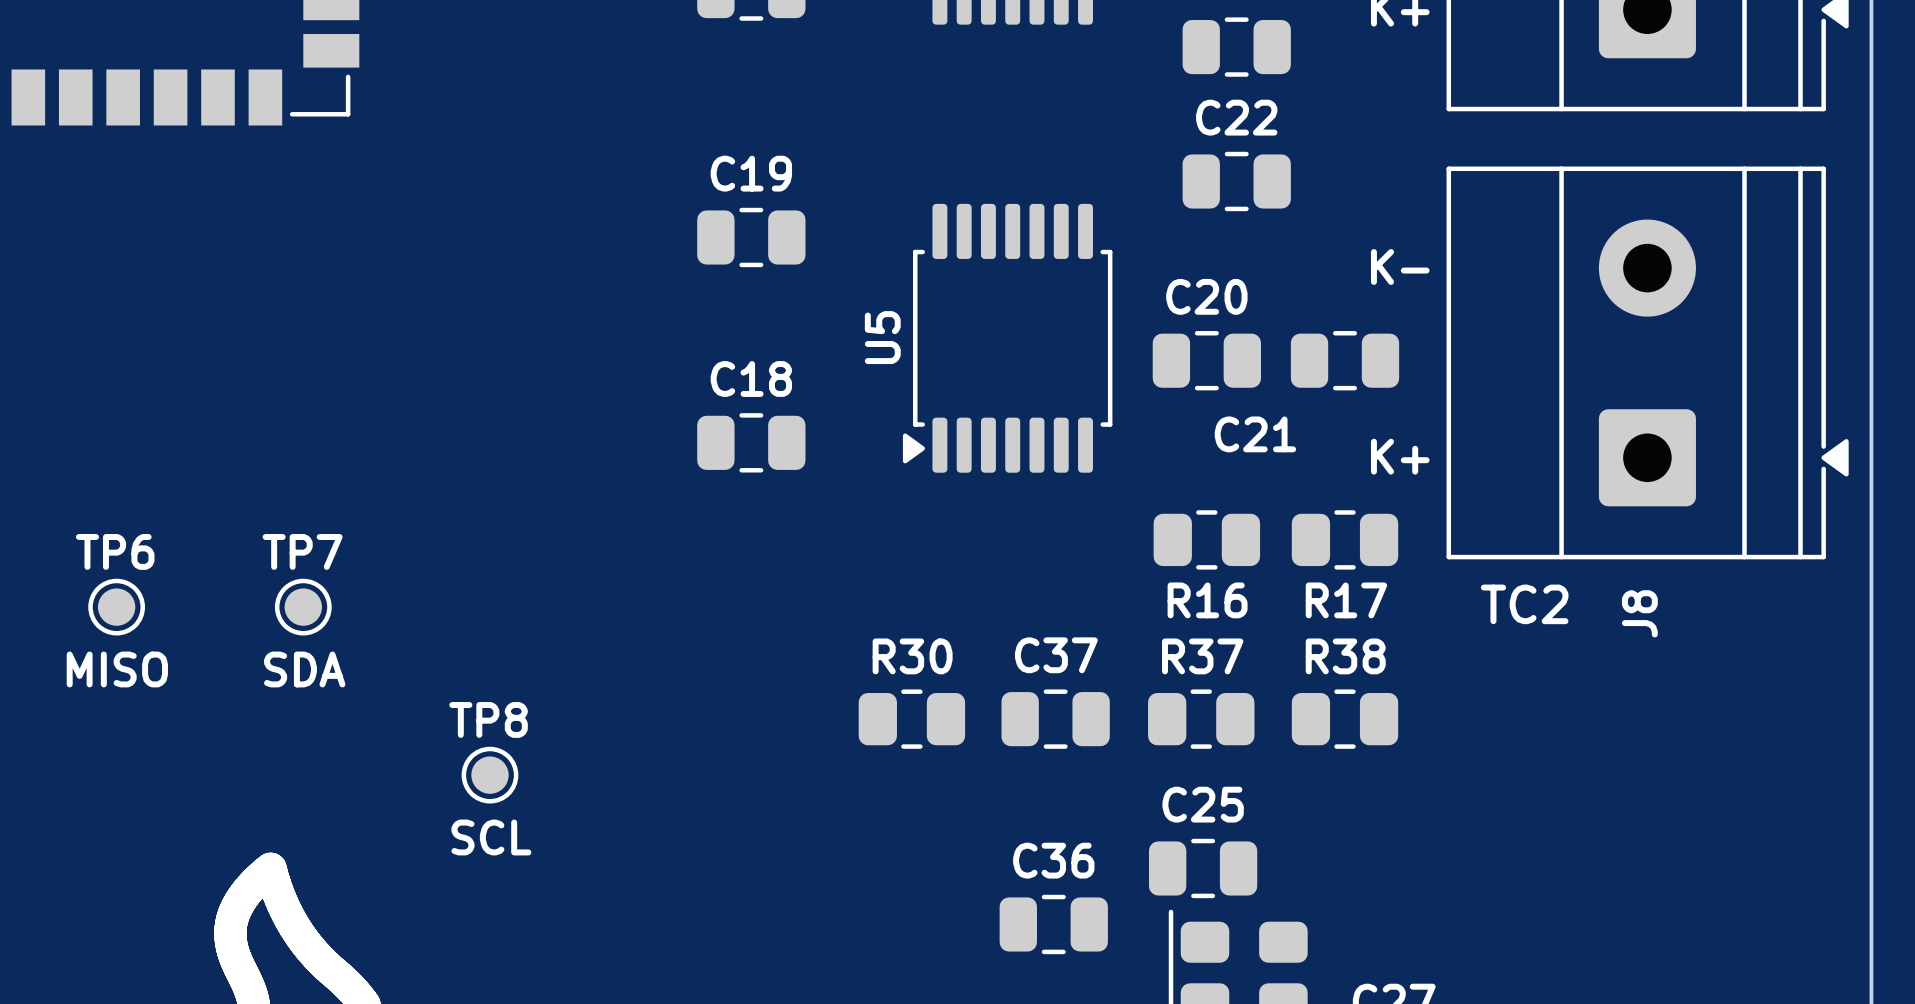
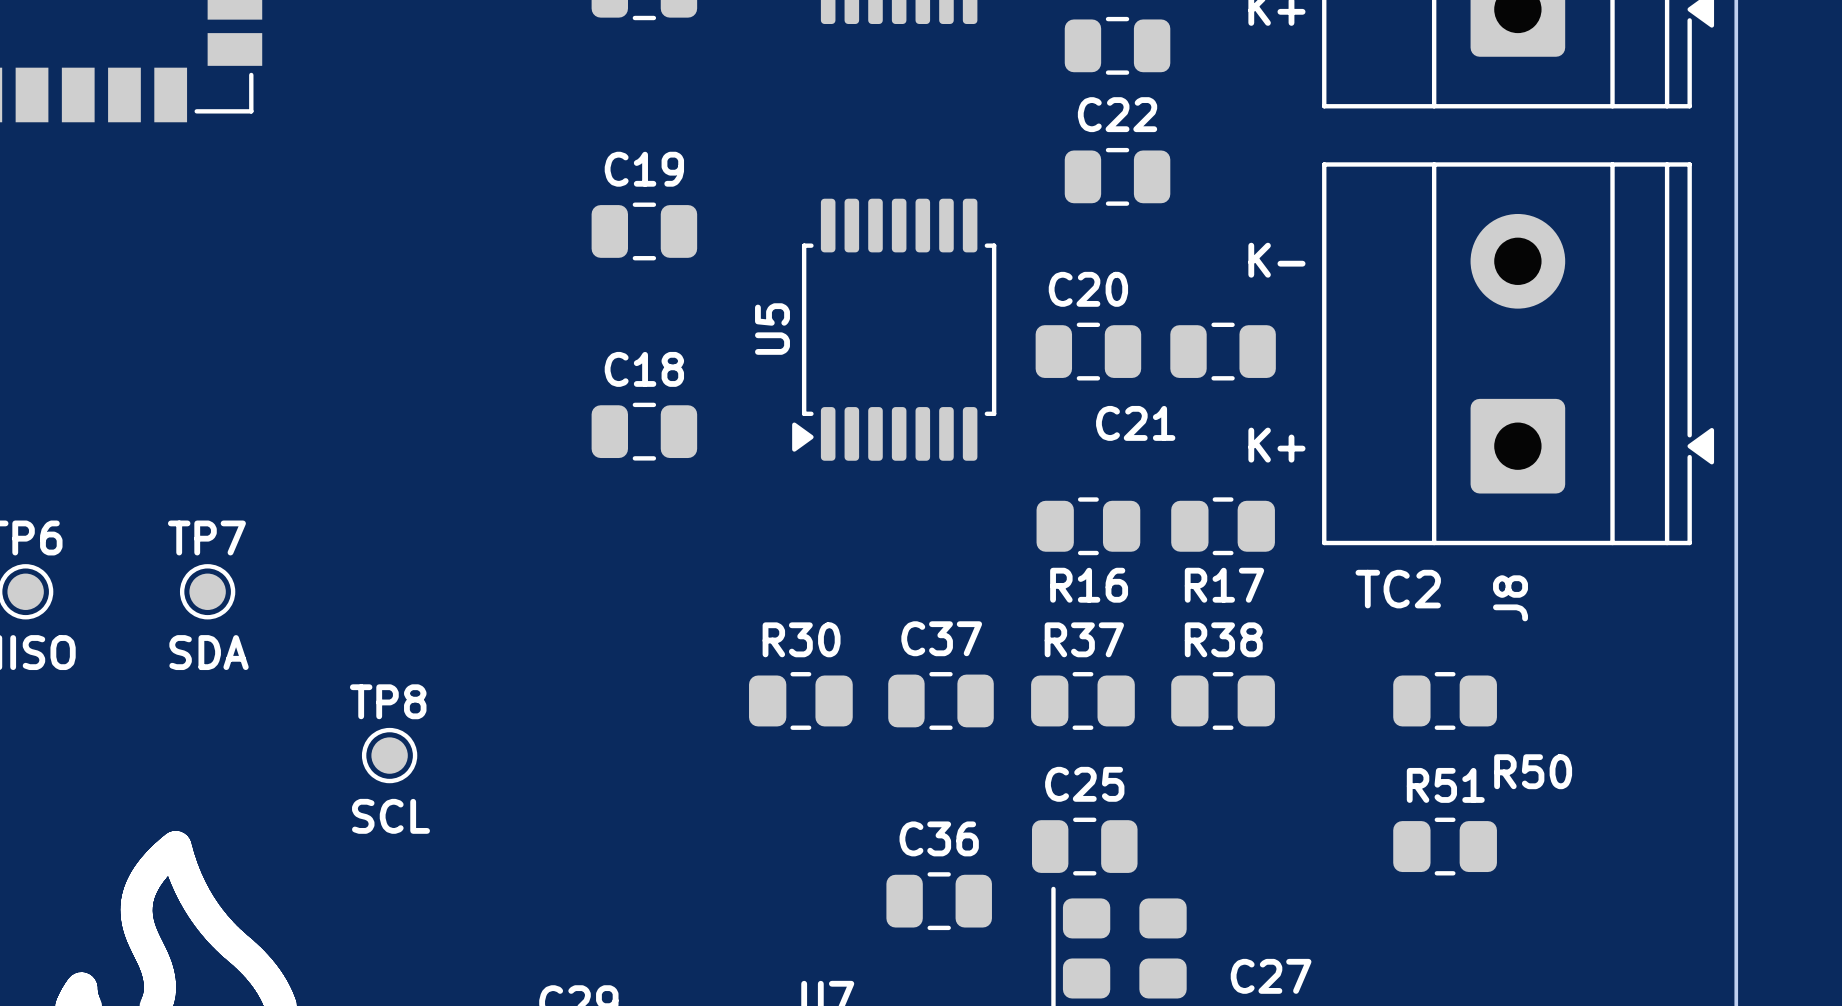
R50: none -> (1445, 700)
R51: none -> (1445, 846)

